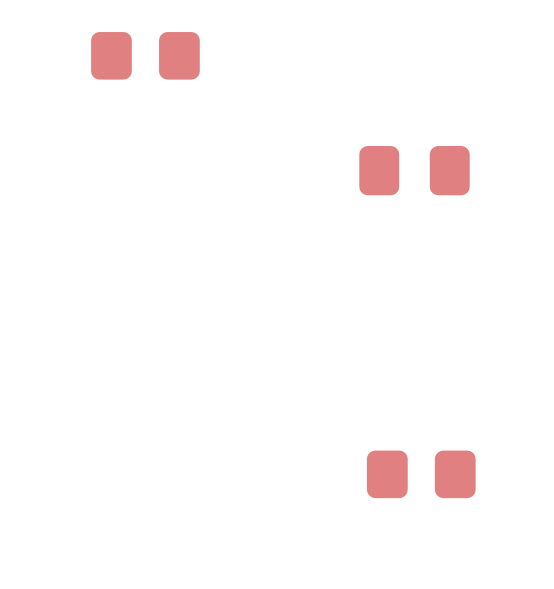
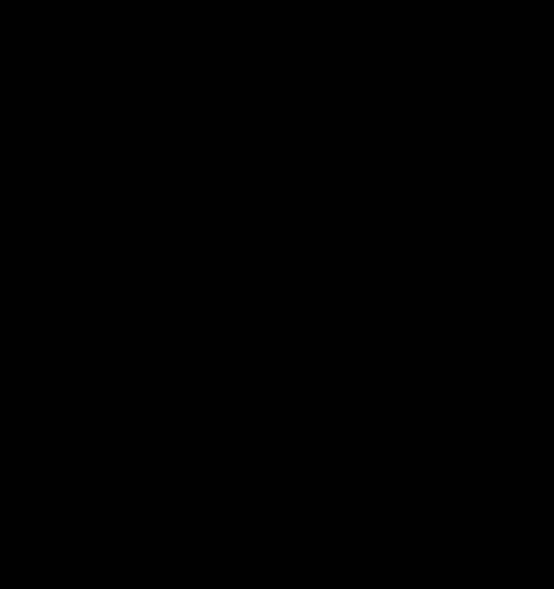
part: (145, 55) -> none
part: (414, 170) -> none
part: (421, 474) -> none

